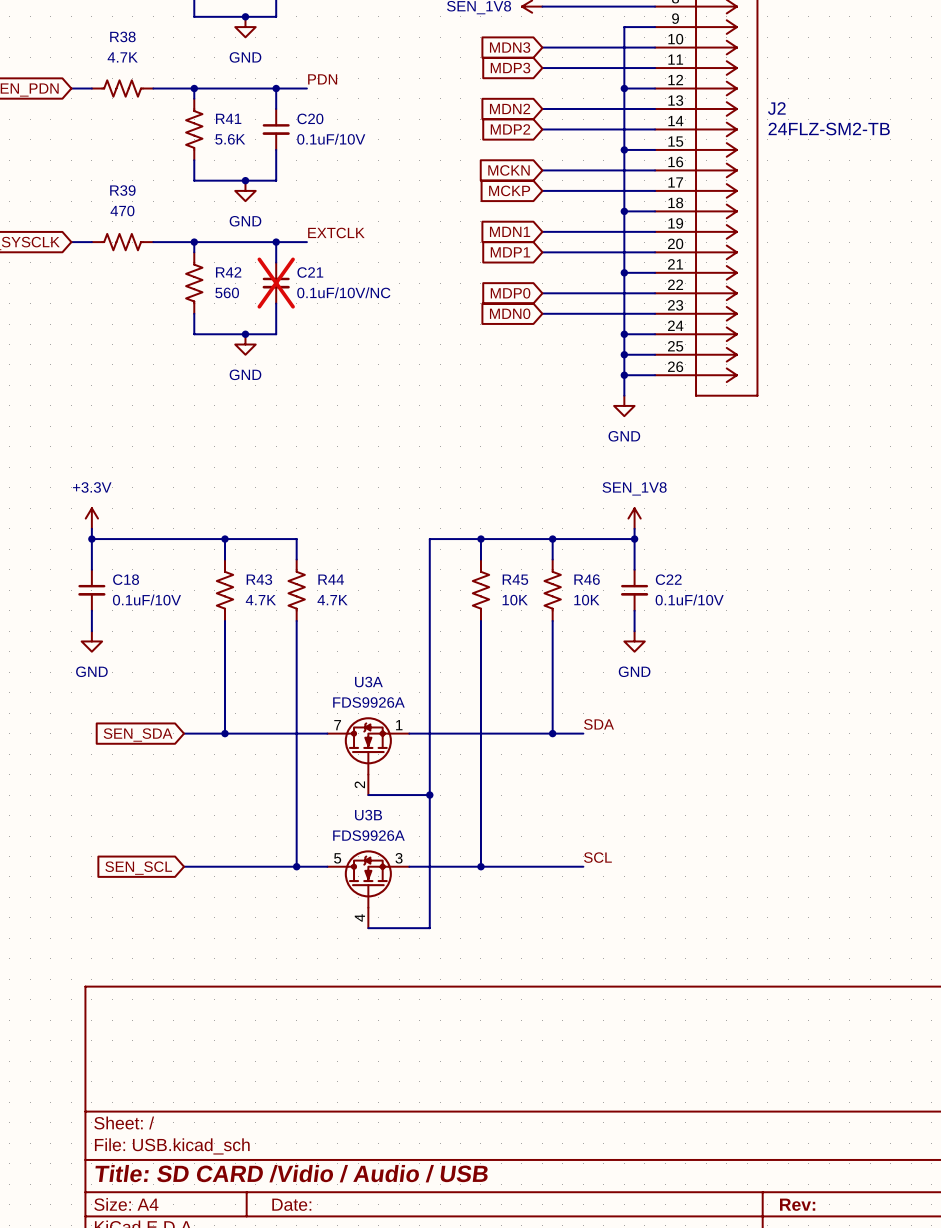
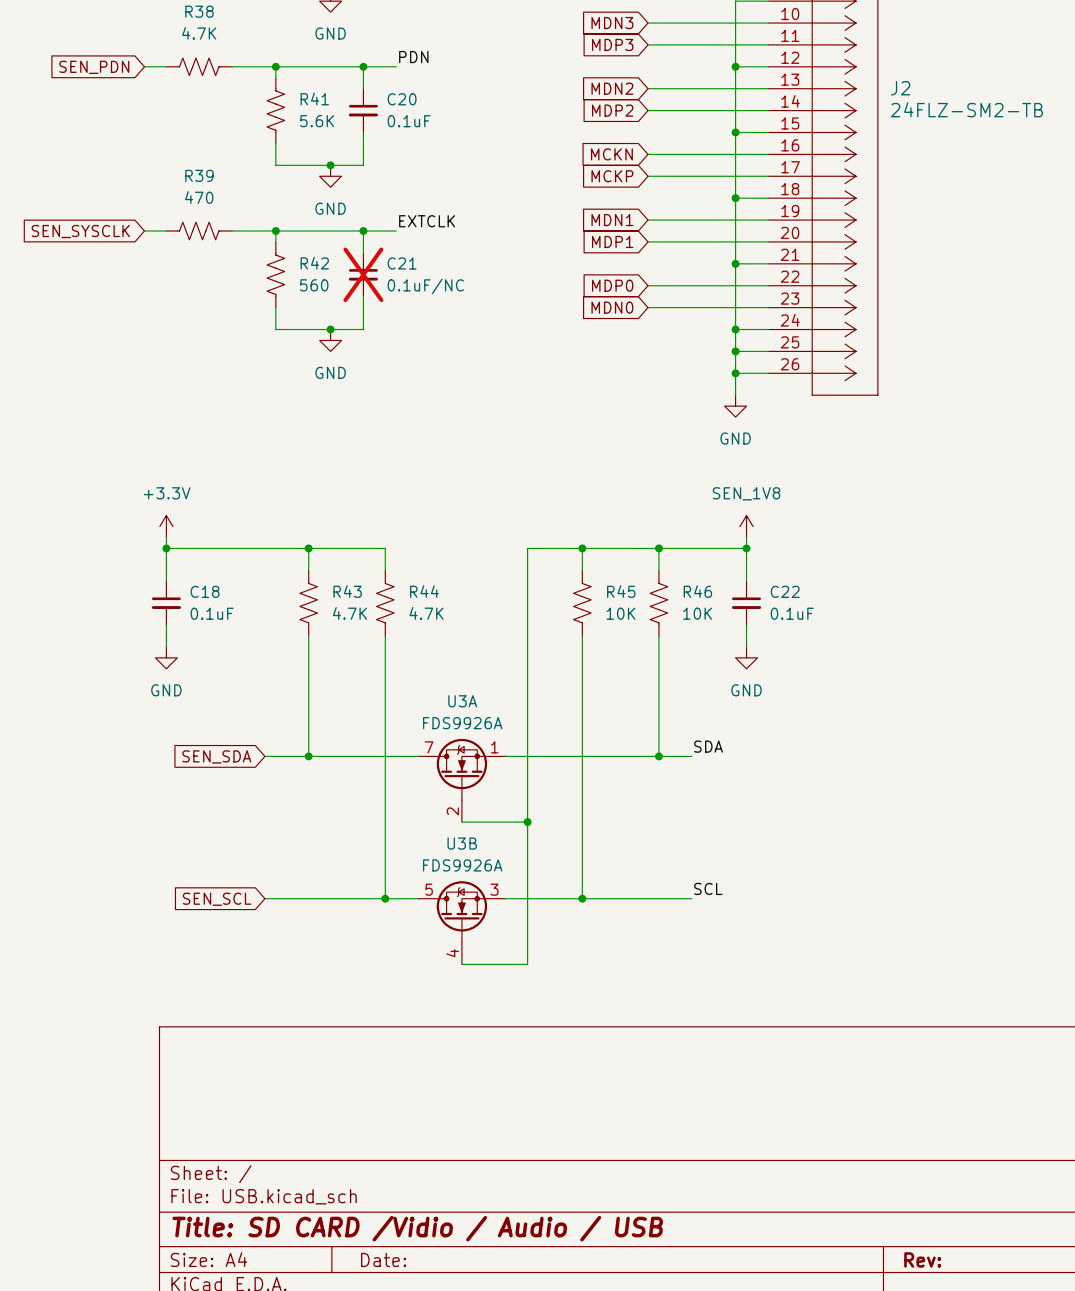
C20 value: 0.1uF/10V (331, 139) -> 0.1uF (409, 121)
C21 value: 0.1uF/10V/NC (343, 292) -> 0.1uF/NC (425, 286)
C18 value: 0.1uF/10V (146, 599) -> 0.1uF (212, 613)
C22 value: 0.1uF/10V (689, 599) -> 0.1uF (792, 613)

